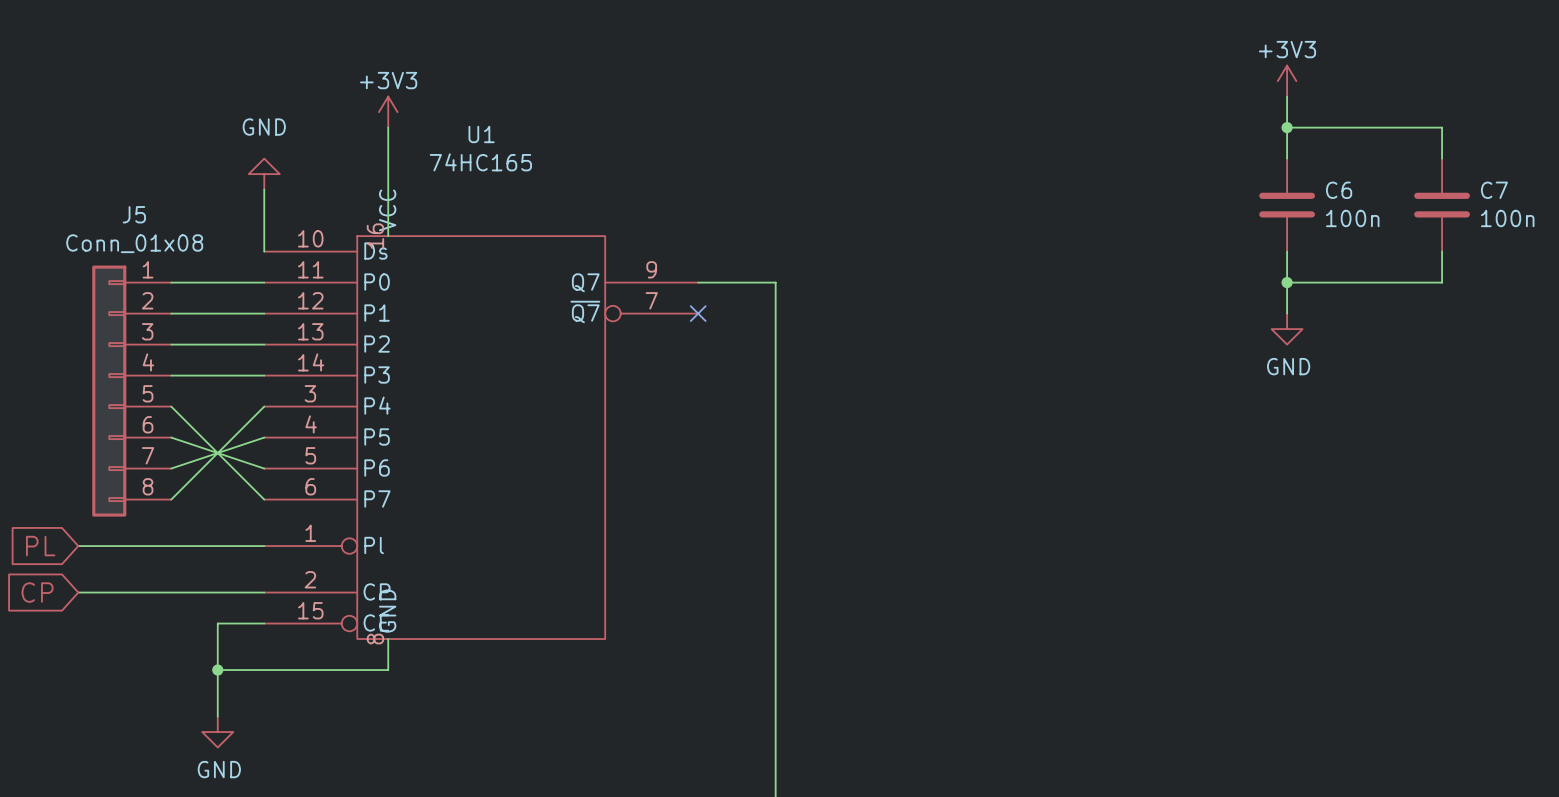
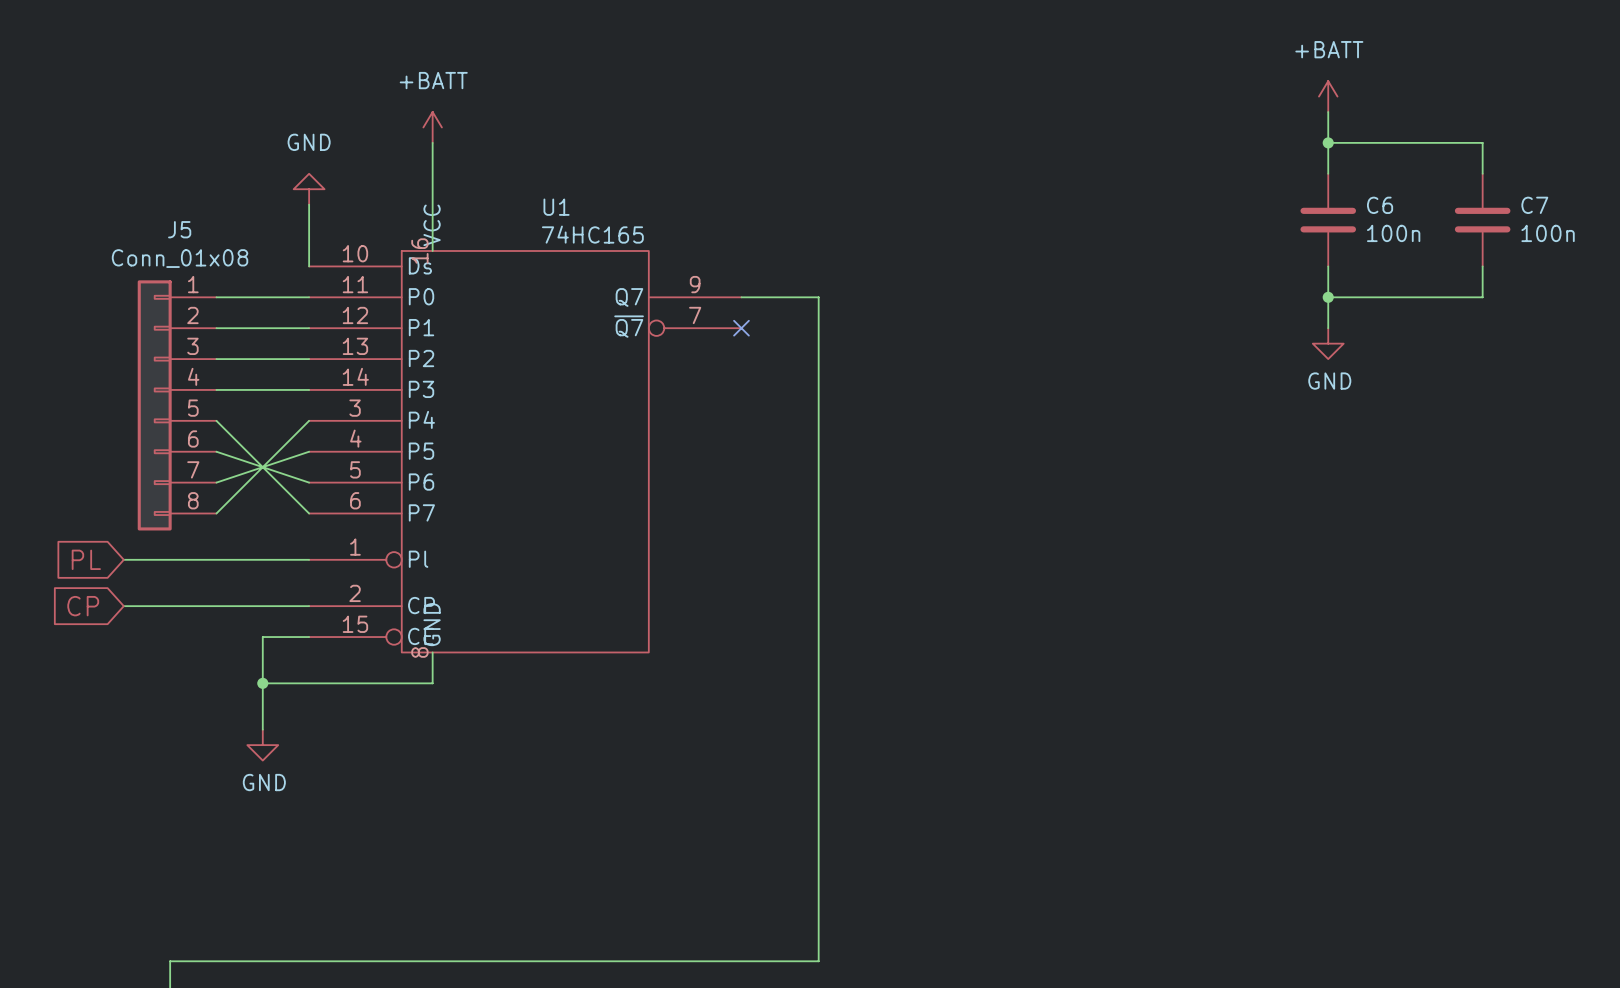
power symbol: +3V3 (1287, 81) -> +BATT (1328, 96)
power symbol: +3V3 (388, 112) -> +BATT (432, 127)
U1 name position: U1 (481, 134) -> U1 (556, 207)
U1 value position: 74HC165 (480, 162) -> 74HC165 (592, 234)

